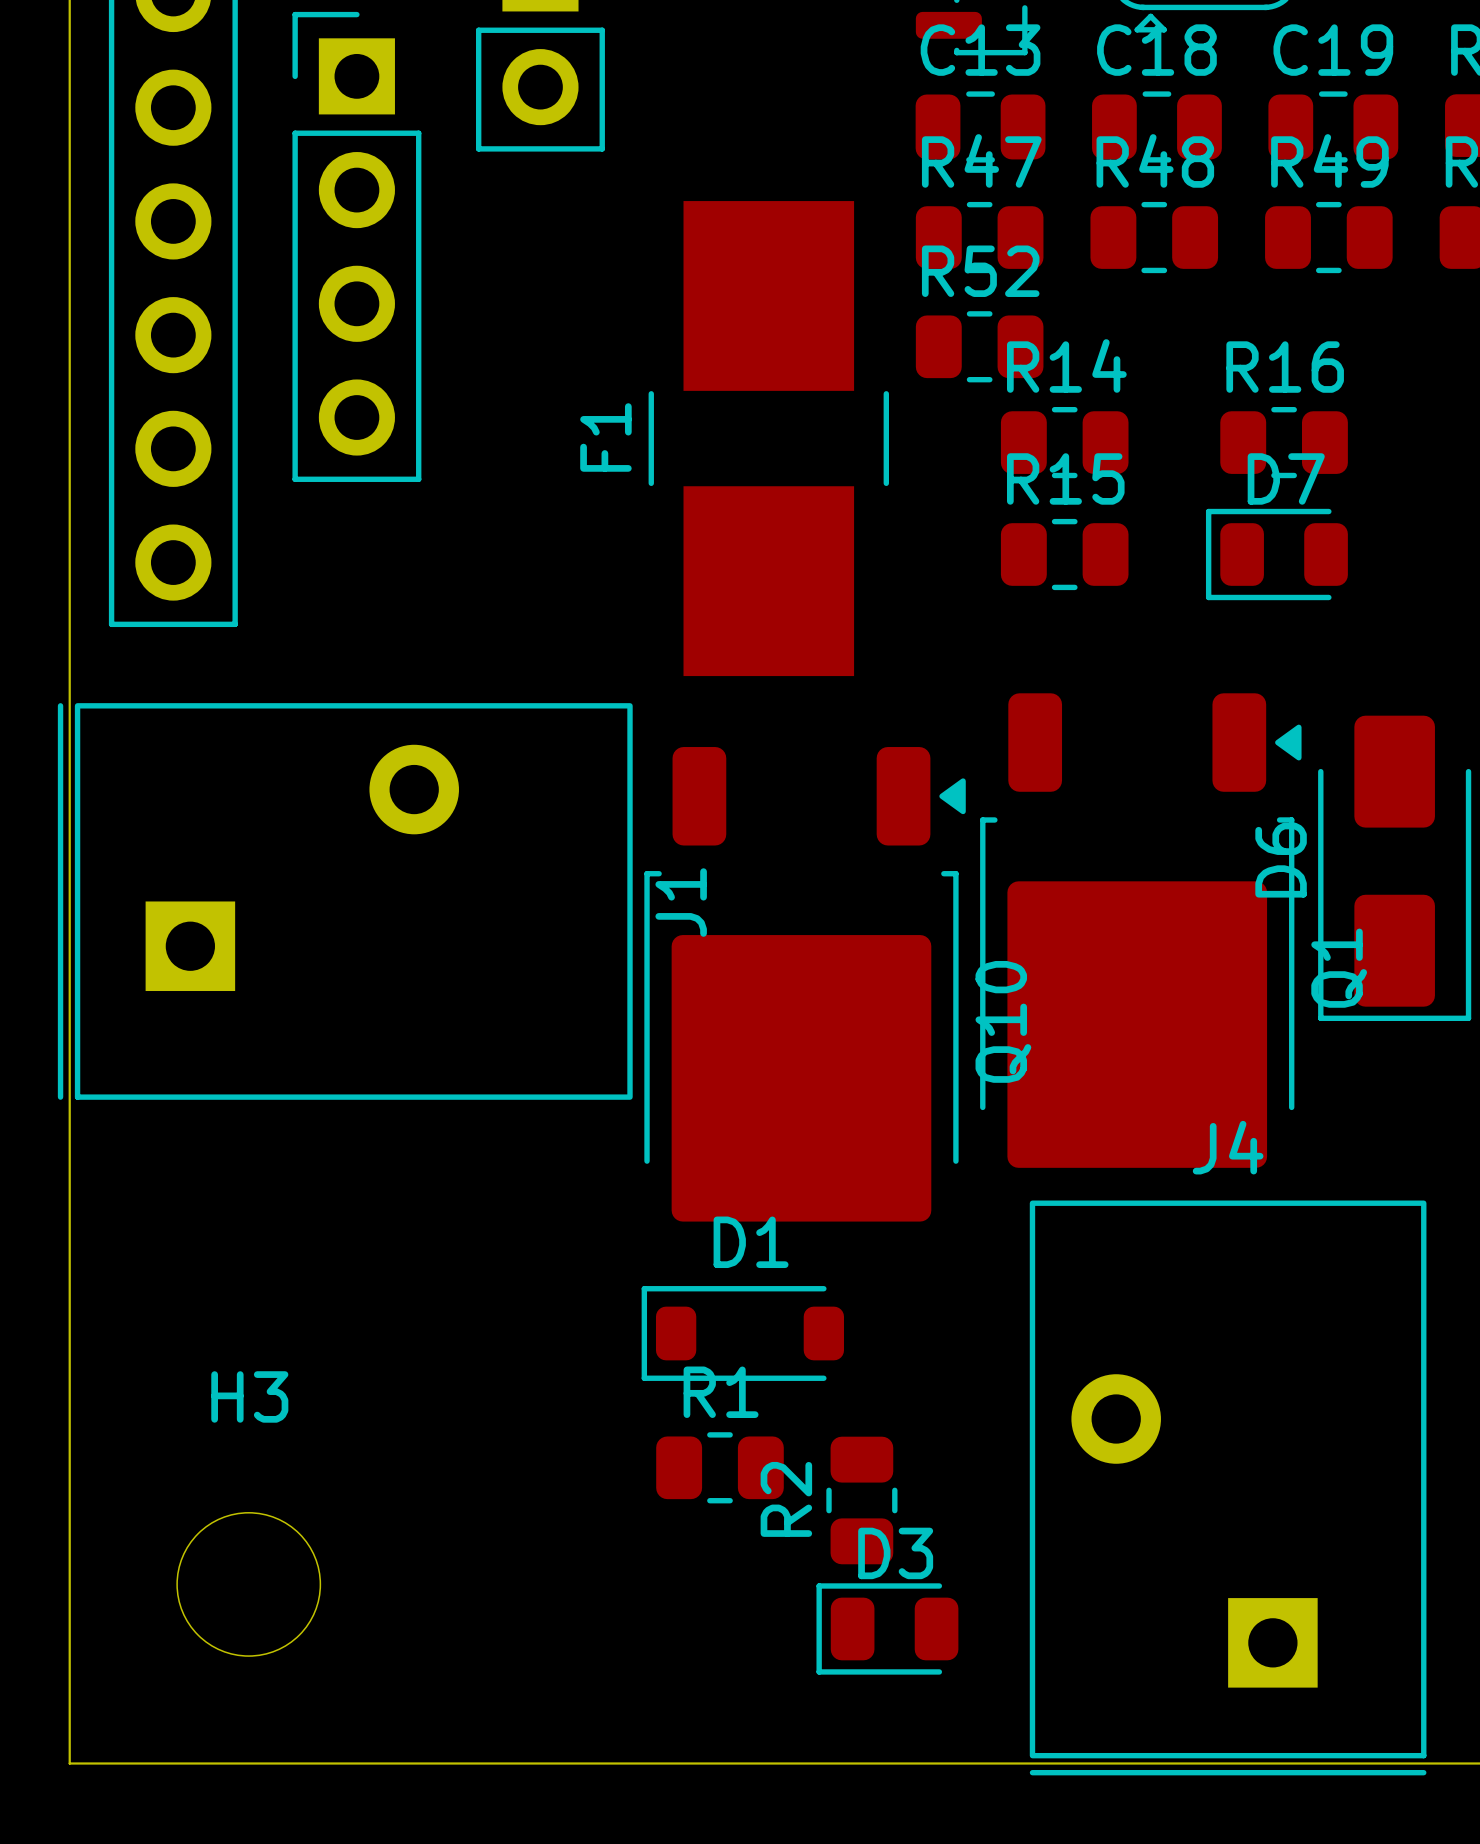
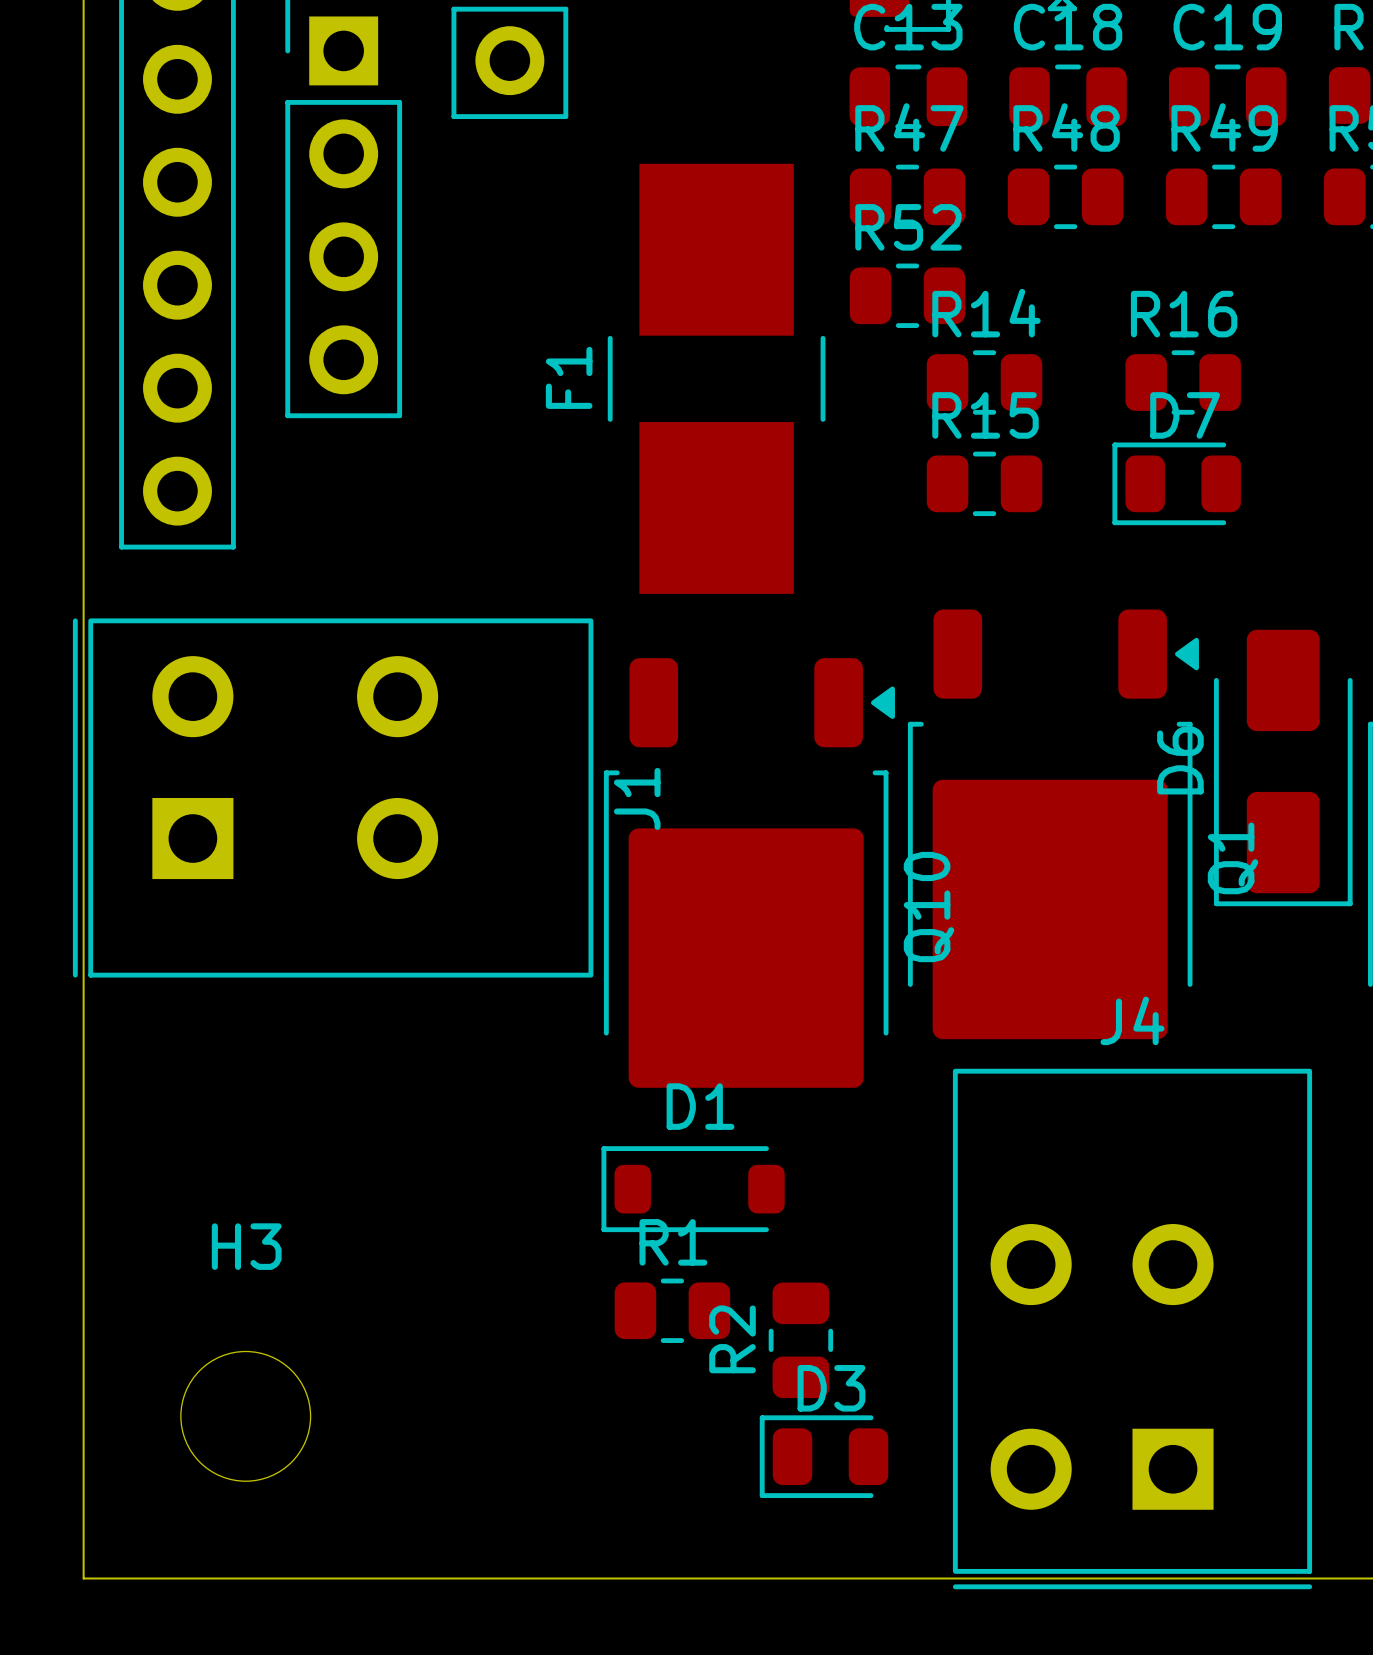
J1 footprint: [57, 703, 633, 1100] -> [72, 618, 594, 978]
J4 footprint: [1029, 1200, 1427, 1776] -> [952, 1068, 1313, 1590]

